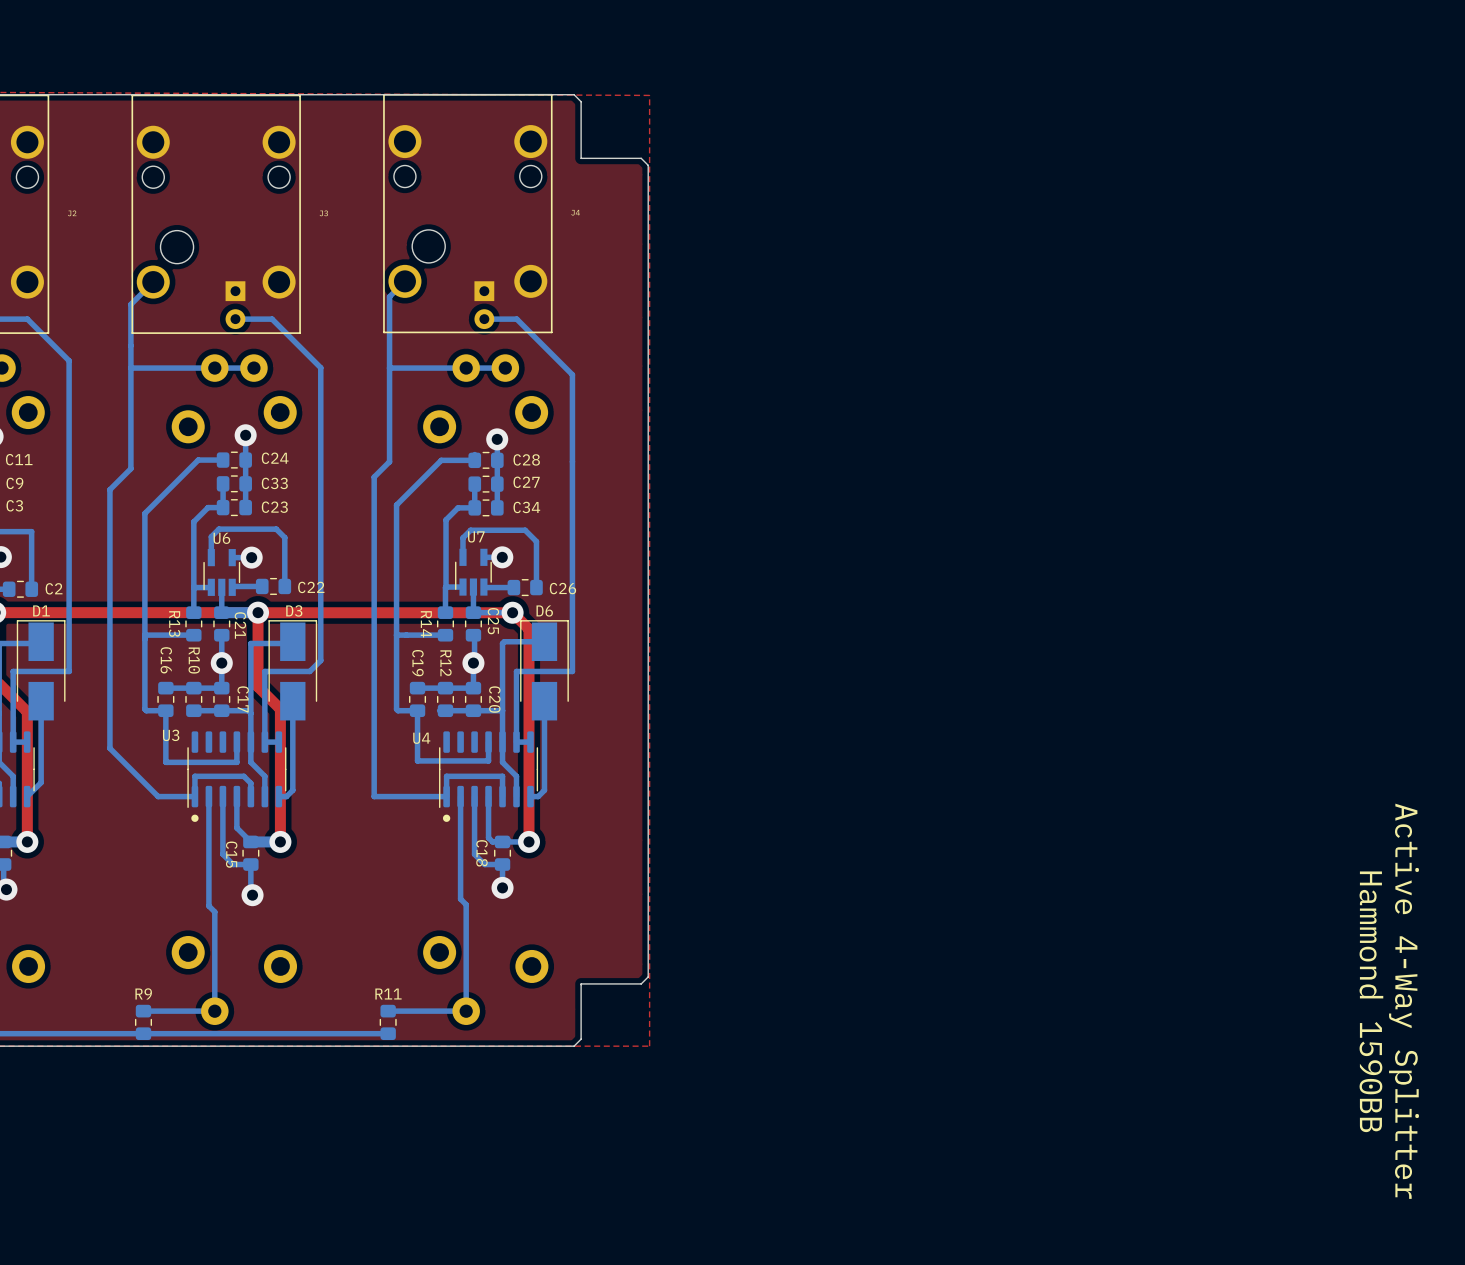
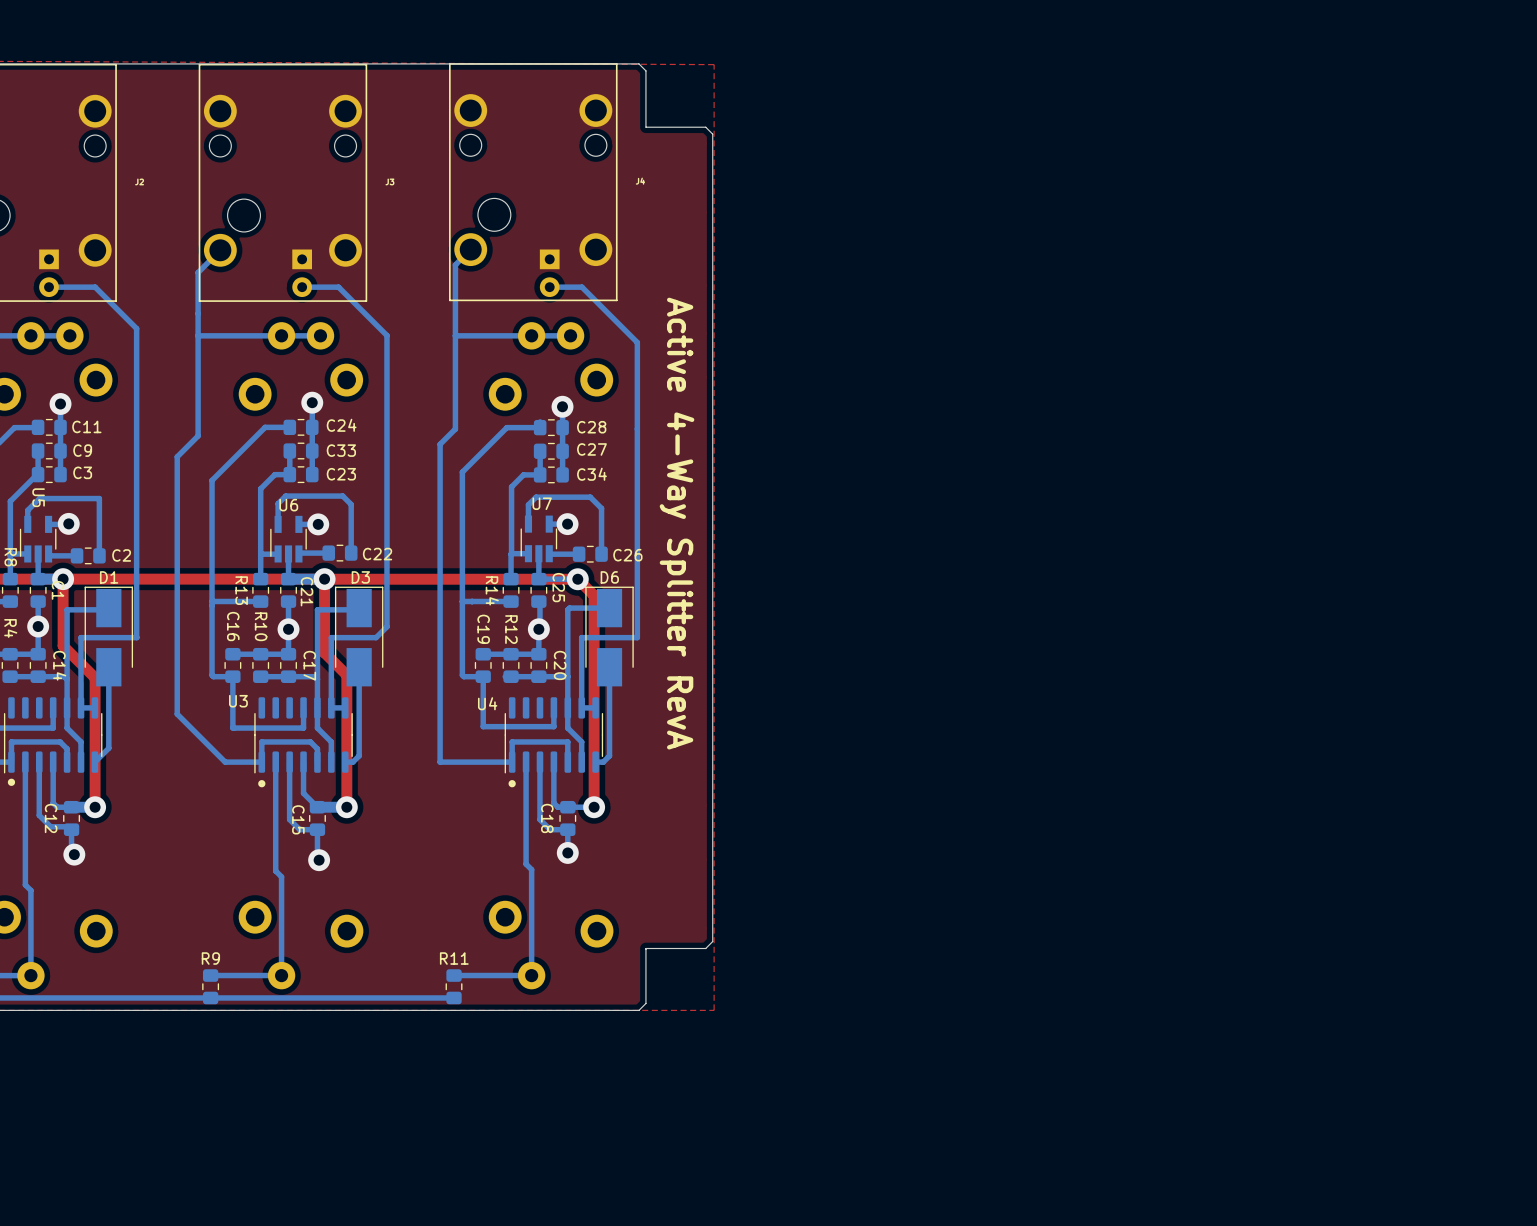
text: none -> Active 4-Way Splitter RevA (677, 523)
text: Hammond 1590BB (1371, 1001) -> none
text: Active 4-Way Splitter (1404, 1001) -> none

